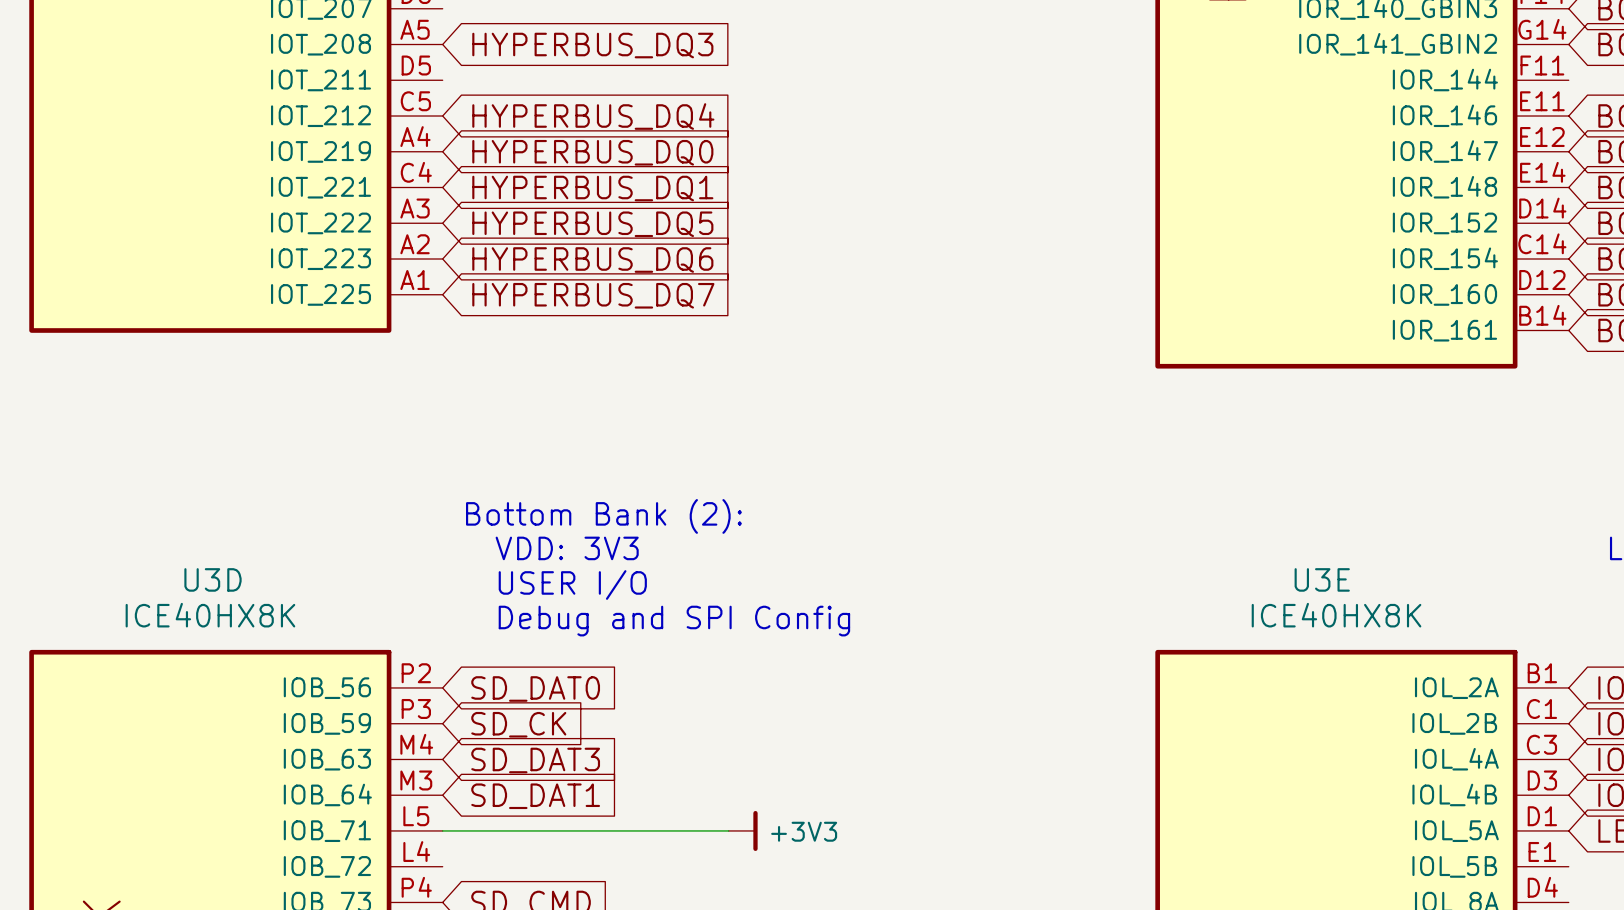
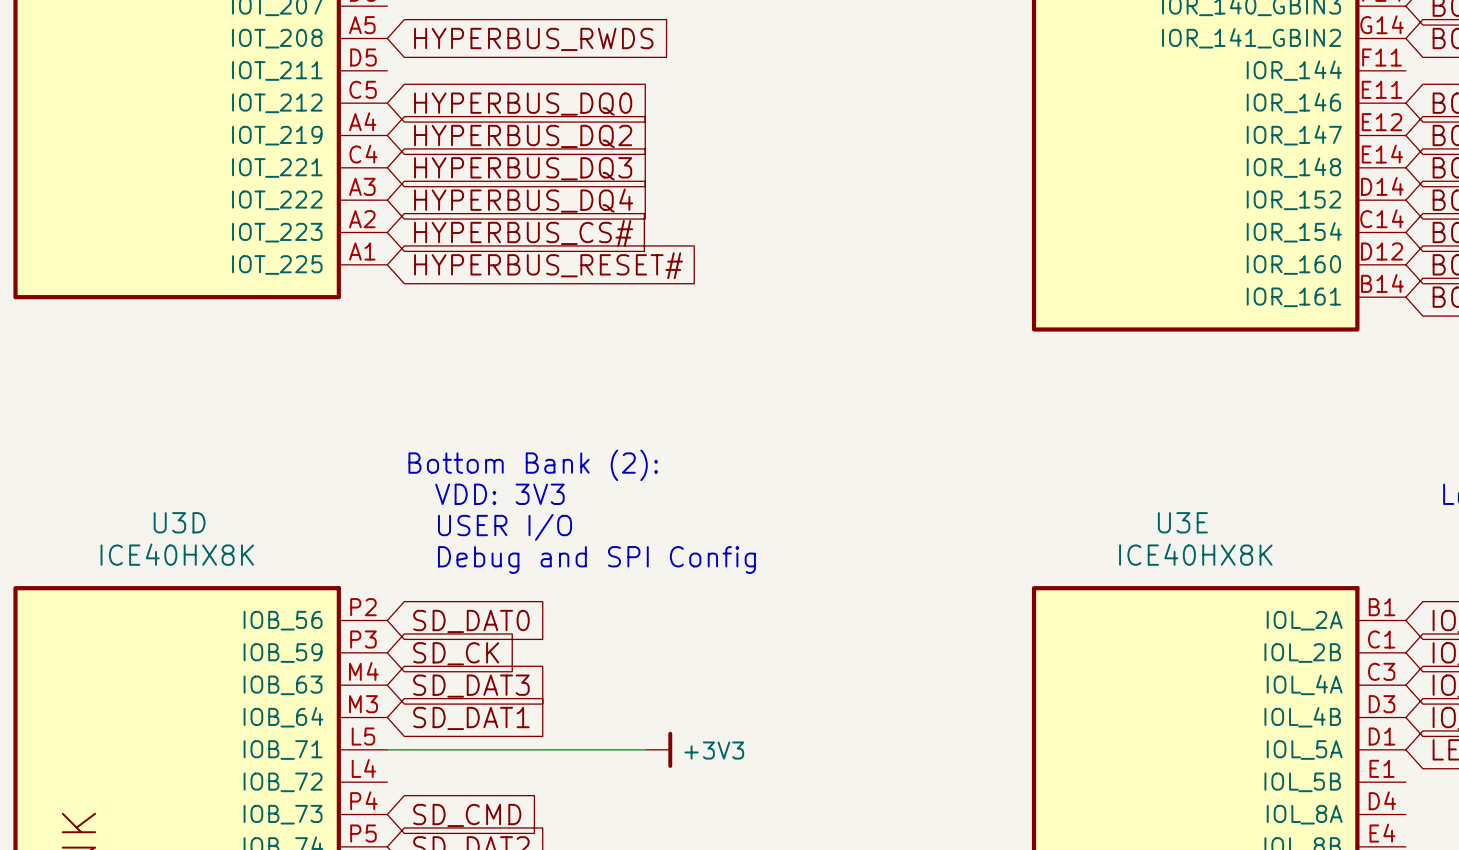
global label: HYPERBUS_DQ3 (592, 45) -> HYPERBUS_RWDS (533, 39)
global label: HYPERBUS_DQ4 (593, 116) -> HYPERBUS_DQ0 (523, 104)
global label: HYPERBUS_DQ0 (592, 152) -> HYPERBUS_DQ2 (523, 136)
global label: HYPERBUS_DQ1 (592, 188) -> HYPERBUS_DQ3 (523, 168)
global label: HYPERBUS_DQ5 (592, 224) -> HYPERBUS_DQ4 (523, 200)
global label: HYPERBUS_DQ6 (592, 260) -> HYPERBUS_CS# (523, 233)
global label: HYPERBUS_DQ7 (593, 295) -> HYPERBUS_RESET# (548, 265)

